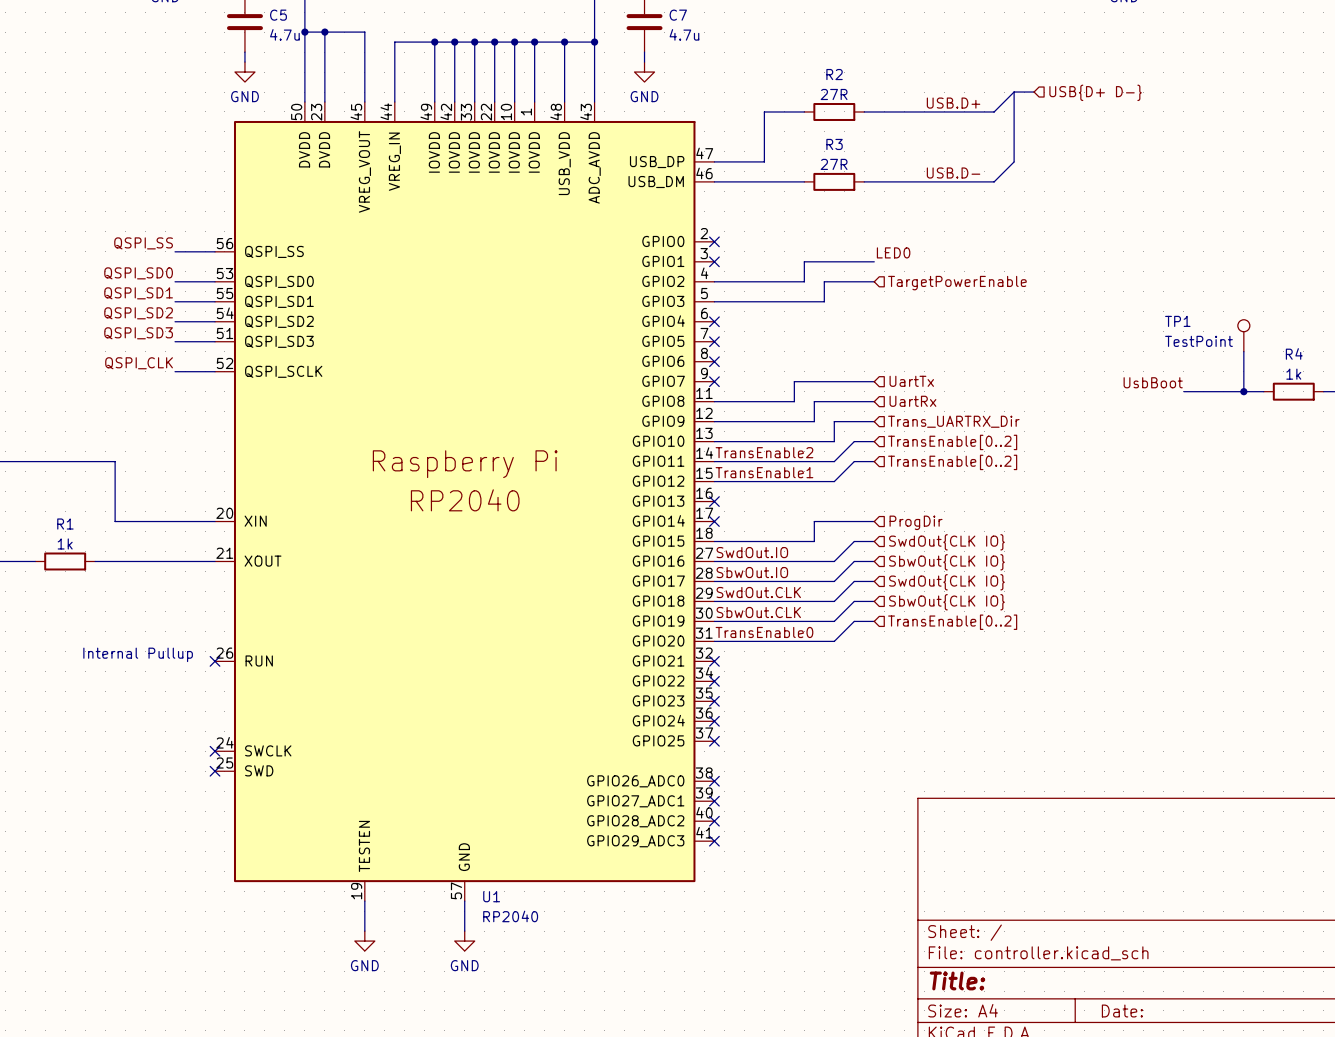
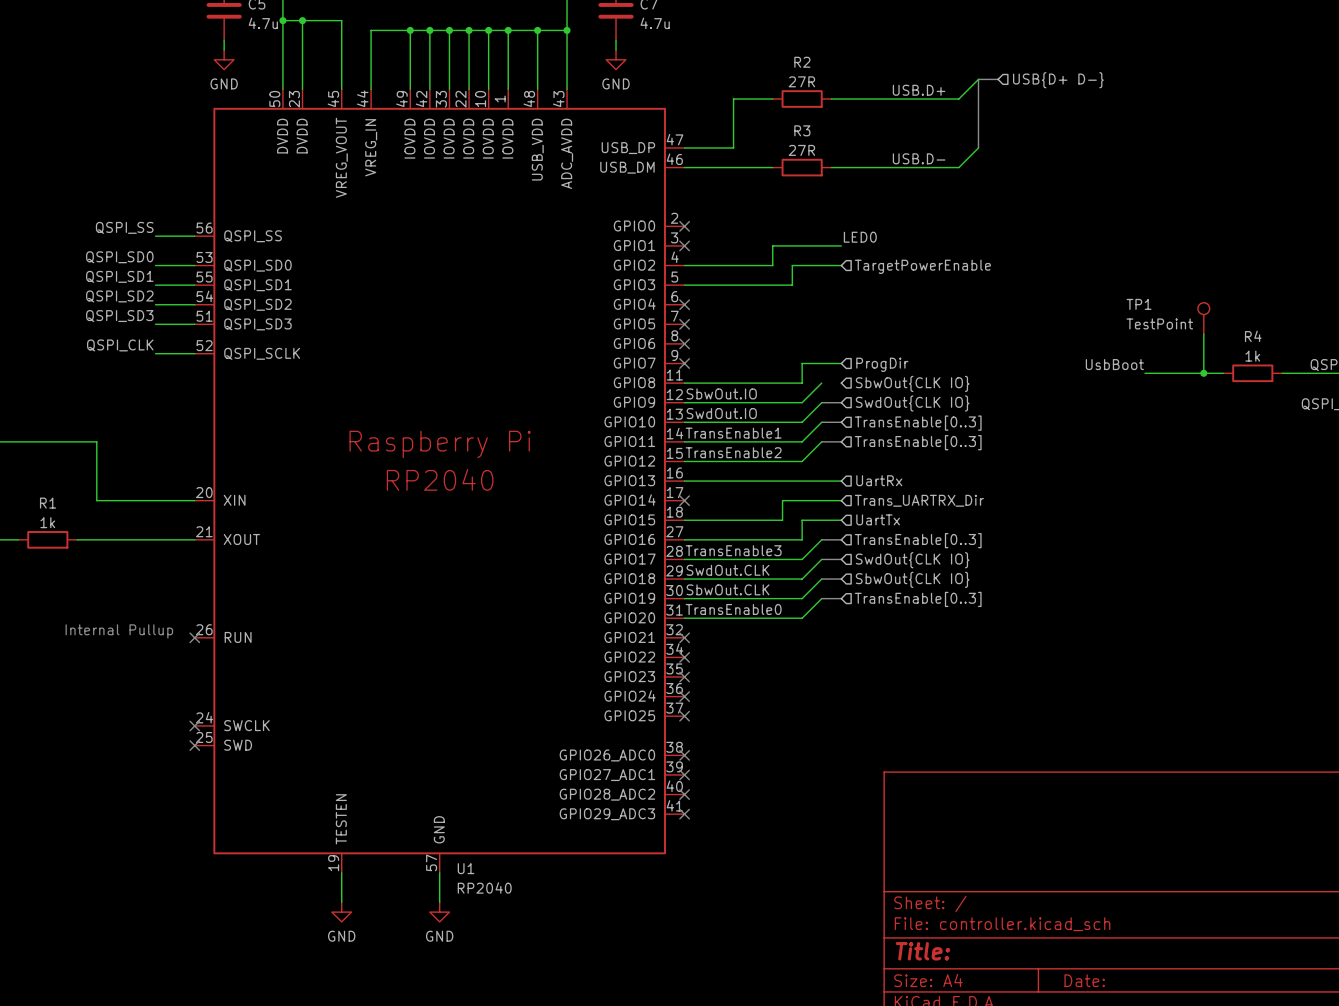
wire: (834, 381) (794, 381) (794, 401) -> (782, 383) (762, 383)
hierarchical label: UartTx (911, 381) -> ProgDir (882, 364)
wire: (814, 401) (814, 421) -> (821, 383) (802, 402) (782, 402)
wire: (834, 401) (874, 401) -> (802, 383) (802, 363)
hierarchical label: UartRx (912, 401) -> SbwOut{CLK IO} (912, 383)
label: none -> SbwOut.IO (721, 393)
wire: (874, 421) (834, 421) (834, 441) -> (821, 402) (802, 422)
hierarchical label: Trans_UARTRX_Dir (953, 421) -> SwdOut{CLK IO} (912, 403)
hierarchical label: TransEnable[0..2] (952, 442) -> TransEnable[0..3] (918, 423)
label: TransEnable2 (764, 452) -> TransEnable1 (733, 433)
hierarchical label: TransEnable[0..2] (952, 462) -> TransEnable[0..3] (918, 442)
label: TransEnable1 (764, 472) -> TransEnable2 (733, 452)
wire: none -> (684, 481) (841, 481)
no-connect mark: (714, 501) -> none
hierarchical label: none -> UartRx (879, 480)
hierarchical label: ProgDir (916, 522) -> Trans_UARTRX_Dir (919, 500)
wire: (854, 541) (834, 561) -> (841, 520) (802, 520) (802, 539)
bus: (854, 541) (874, 541) -> (821, 402) (841, 402)
hierarchical label: SwdOut{CLK IO} (946, 542) -> UartTx (878, 519)
label position: SwdOut.IO (752, 552) -> SwdOut.IO (721, 413)
hierarchical label: SbwOut{CLK IO} (946, 562) -> TransEnable[0..3] (918, 540)
label: SbwOut.IO (752, 572) -> TransEnable3 (733, 550)
hierarchical label: TransEnable[0..2] (952, 622) -> TransEnable[0..3] (918, 599)

